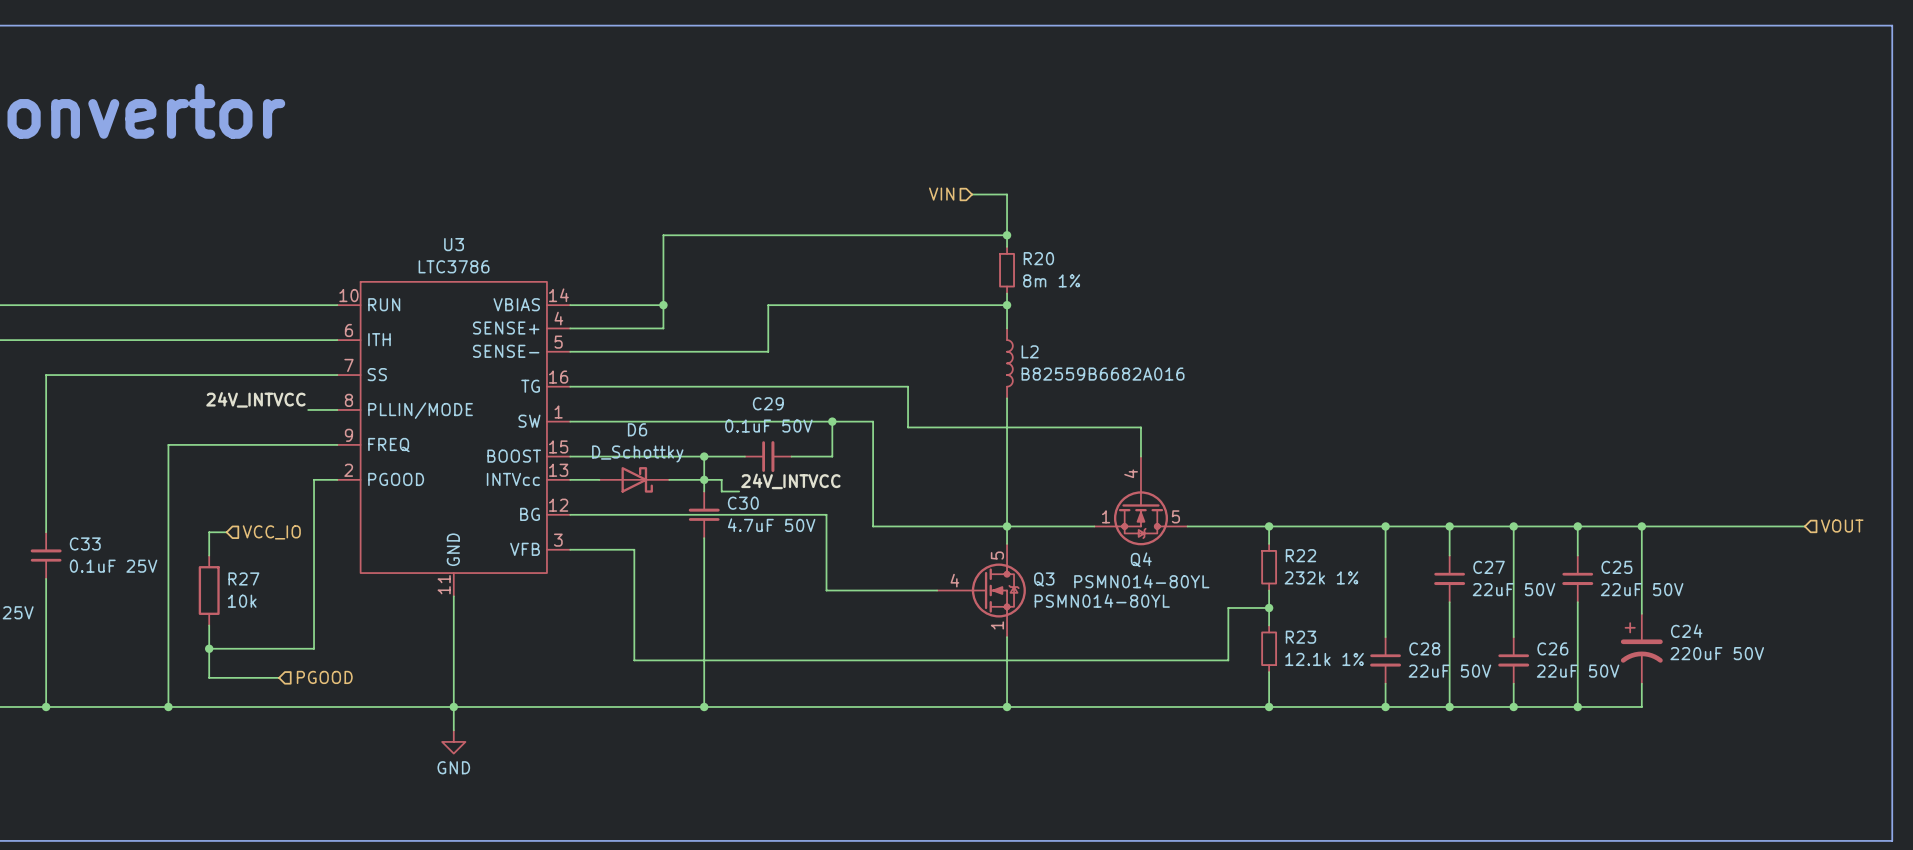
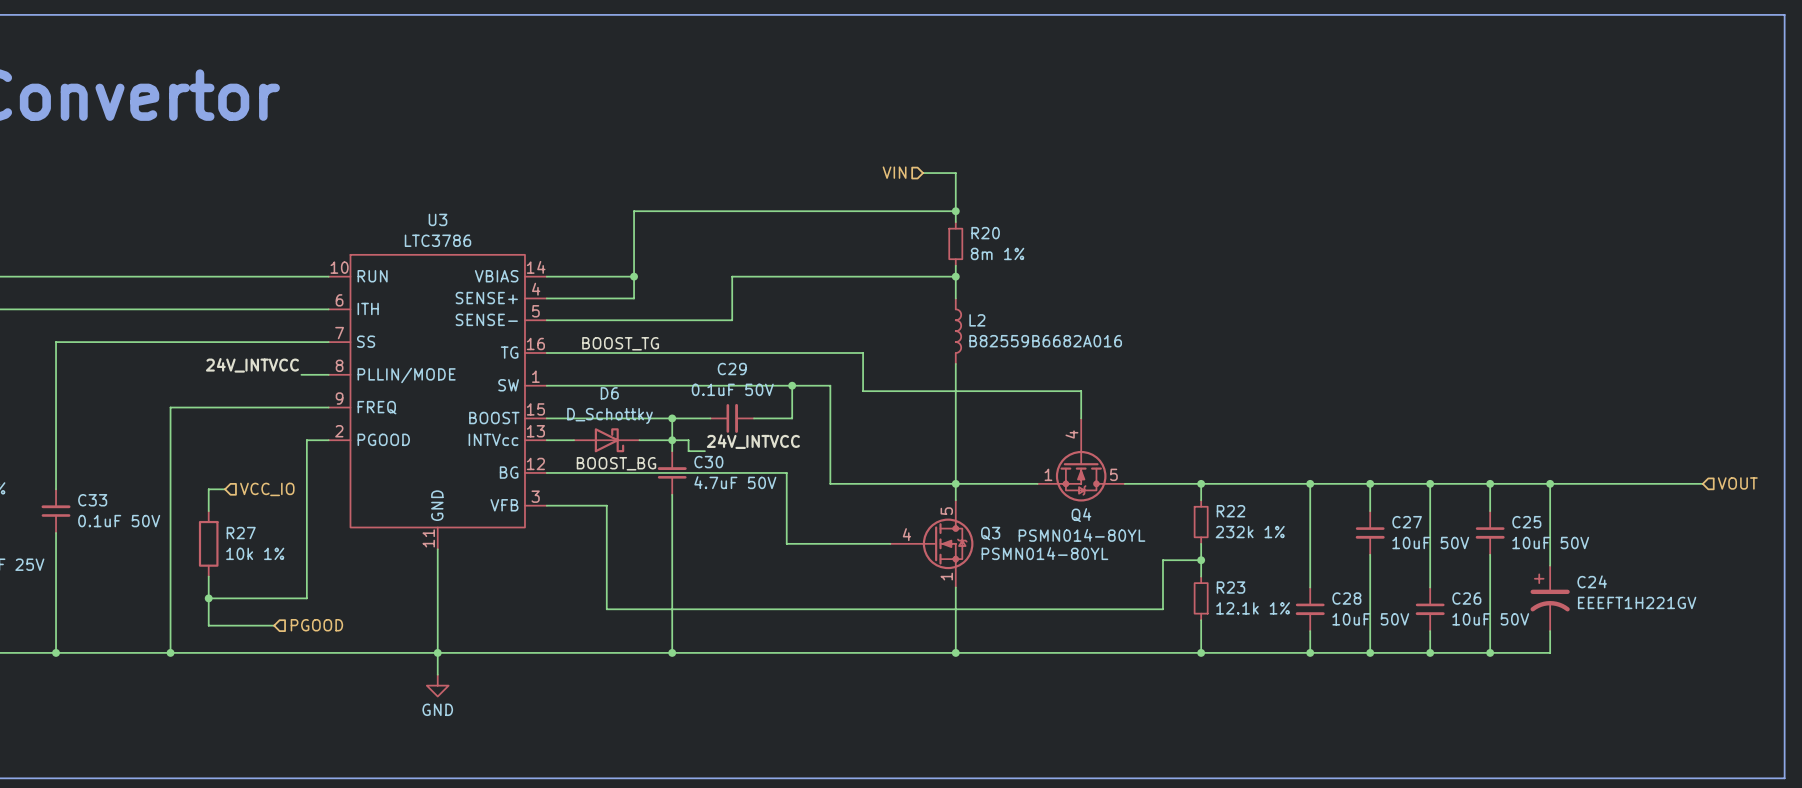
label: none -> BOOST_TG (620, 343)
label: none -> BOOST_BG (616, 463)
C33 value: 0.1uF 25V (113, 566) -> 0.1uF 50V (119, 521)
C27 value: 22uF 50V (1514, 589) -> 10uF 50V (1430, 543)
C25 value: 22uF 50V (1642, 589) -> 10uF 50V (1550, 543)
R27 value: 10k (242, 601) -> 10k 1% (255, 553)
C24 value: 220uF 50V (1717, 653) -> EEEFT1H221GV (1637, 602)
C28 value: 22uF 50V (1449, 671) -> 10uF 50V (1370, 619)
C26 value: 22uF 50V (1578, 671) -> 10uF 50V (1490, 619)

